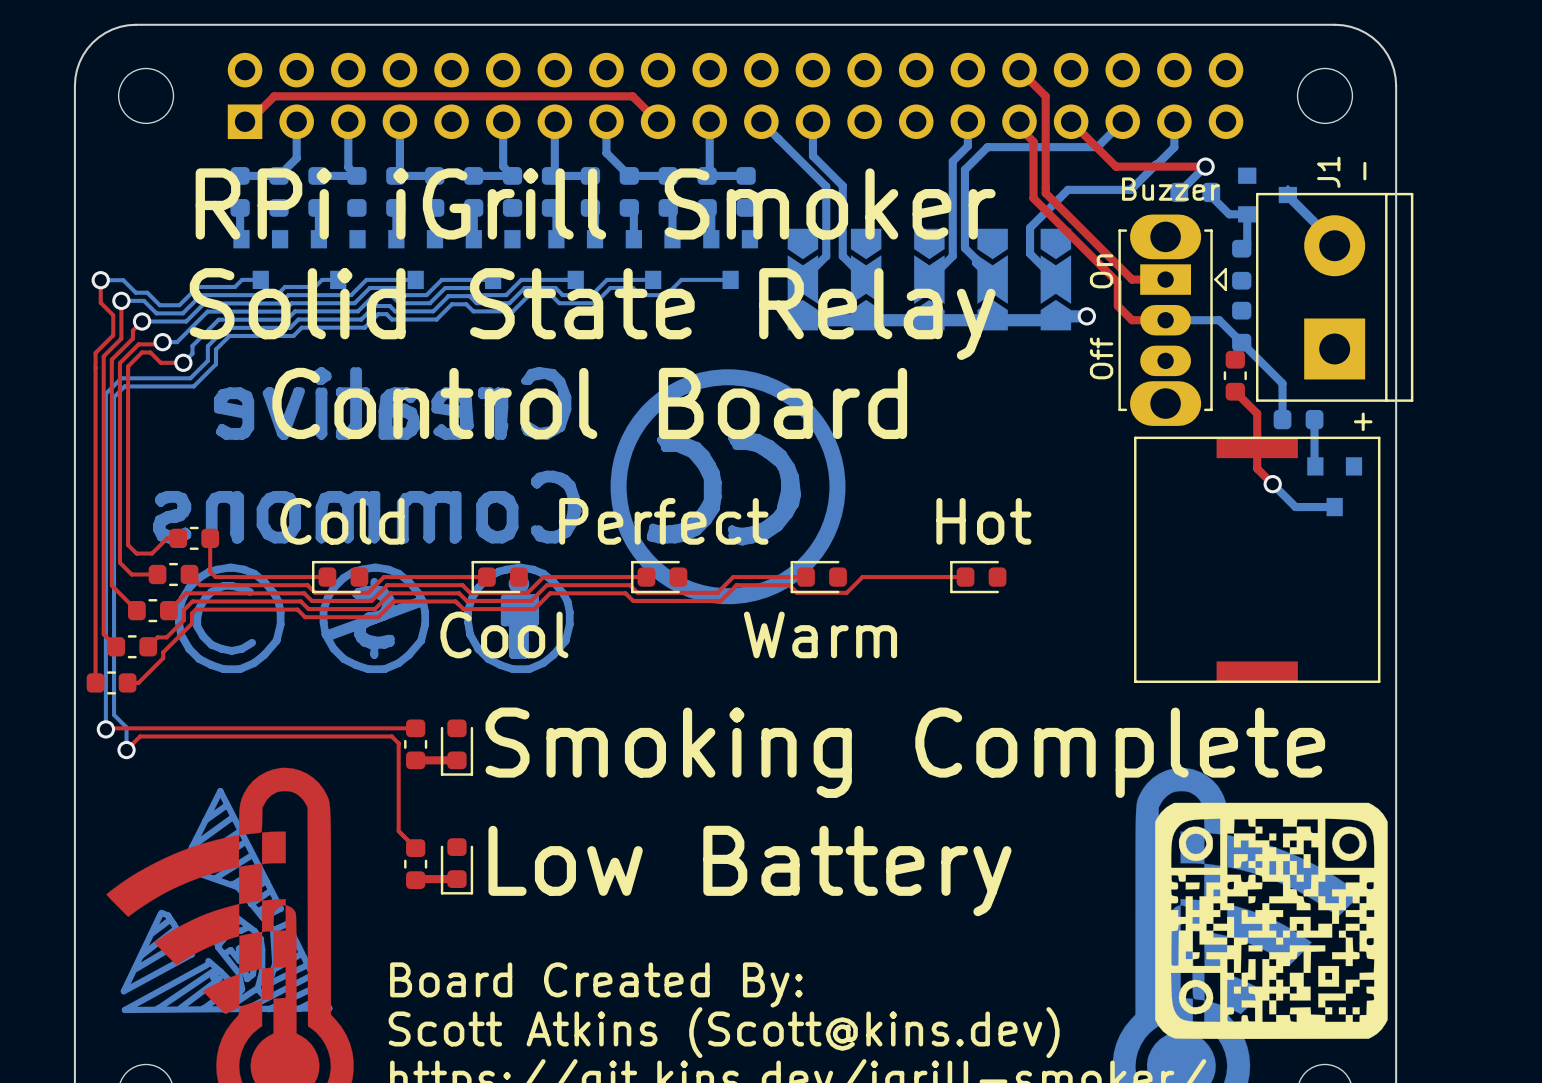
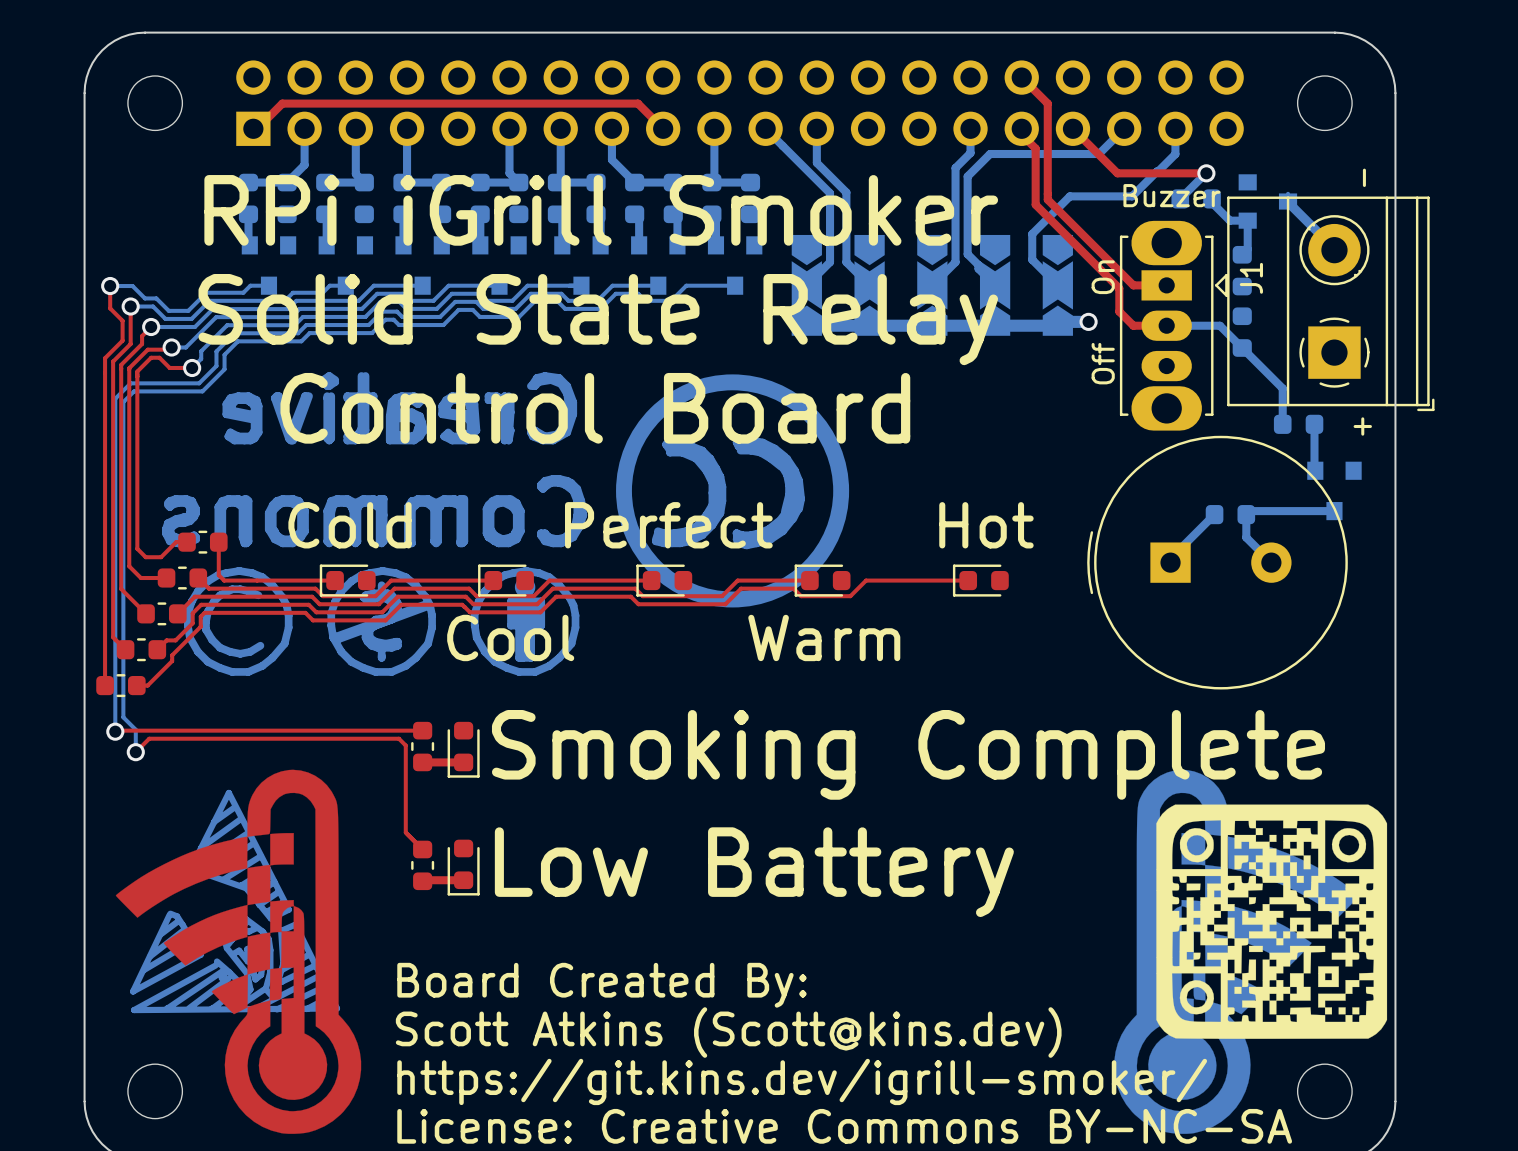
J1 name position: J1 (1328, 172) -> J1 (1251, 278)
J1 footprint: [1256, 192, 1414, 402] -> [1227, 196, 1435, 412]
part side: top (1235, 375) -> bottom (1230, 514)
top track: (1235, 391) (1257, 413) (1257, 468) (1272, 484) -> none
bottom track: (1272, 484) (1295, 507) -> (1271, 562) (1246, 537) (1246, 514) (1249, 511) (1295, 511)
via: (1272, 484) -> none
bottom track: none -> (1214, 514) (1170, 558) (1170, 562)
part: none -> (1217, 562)
part: (1257, 559) -> none

